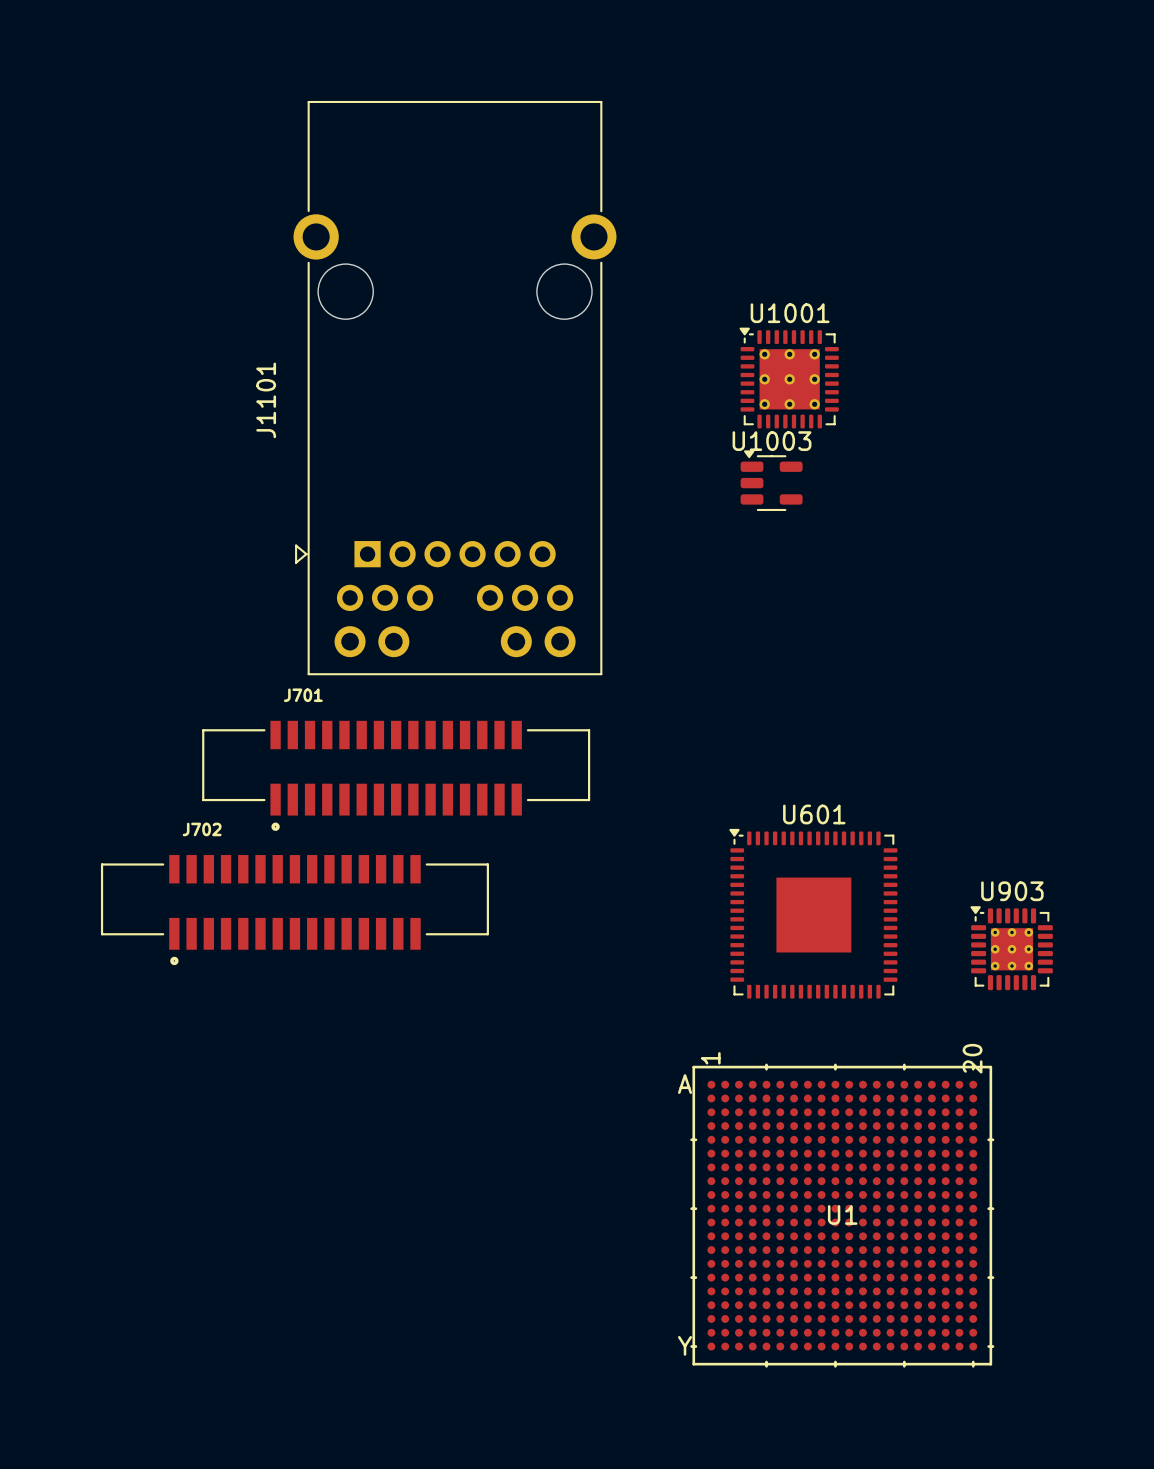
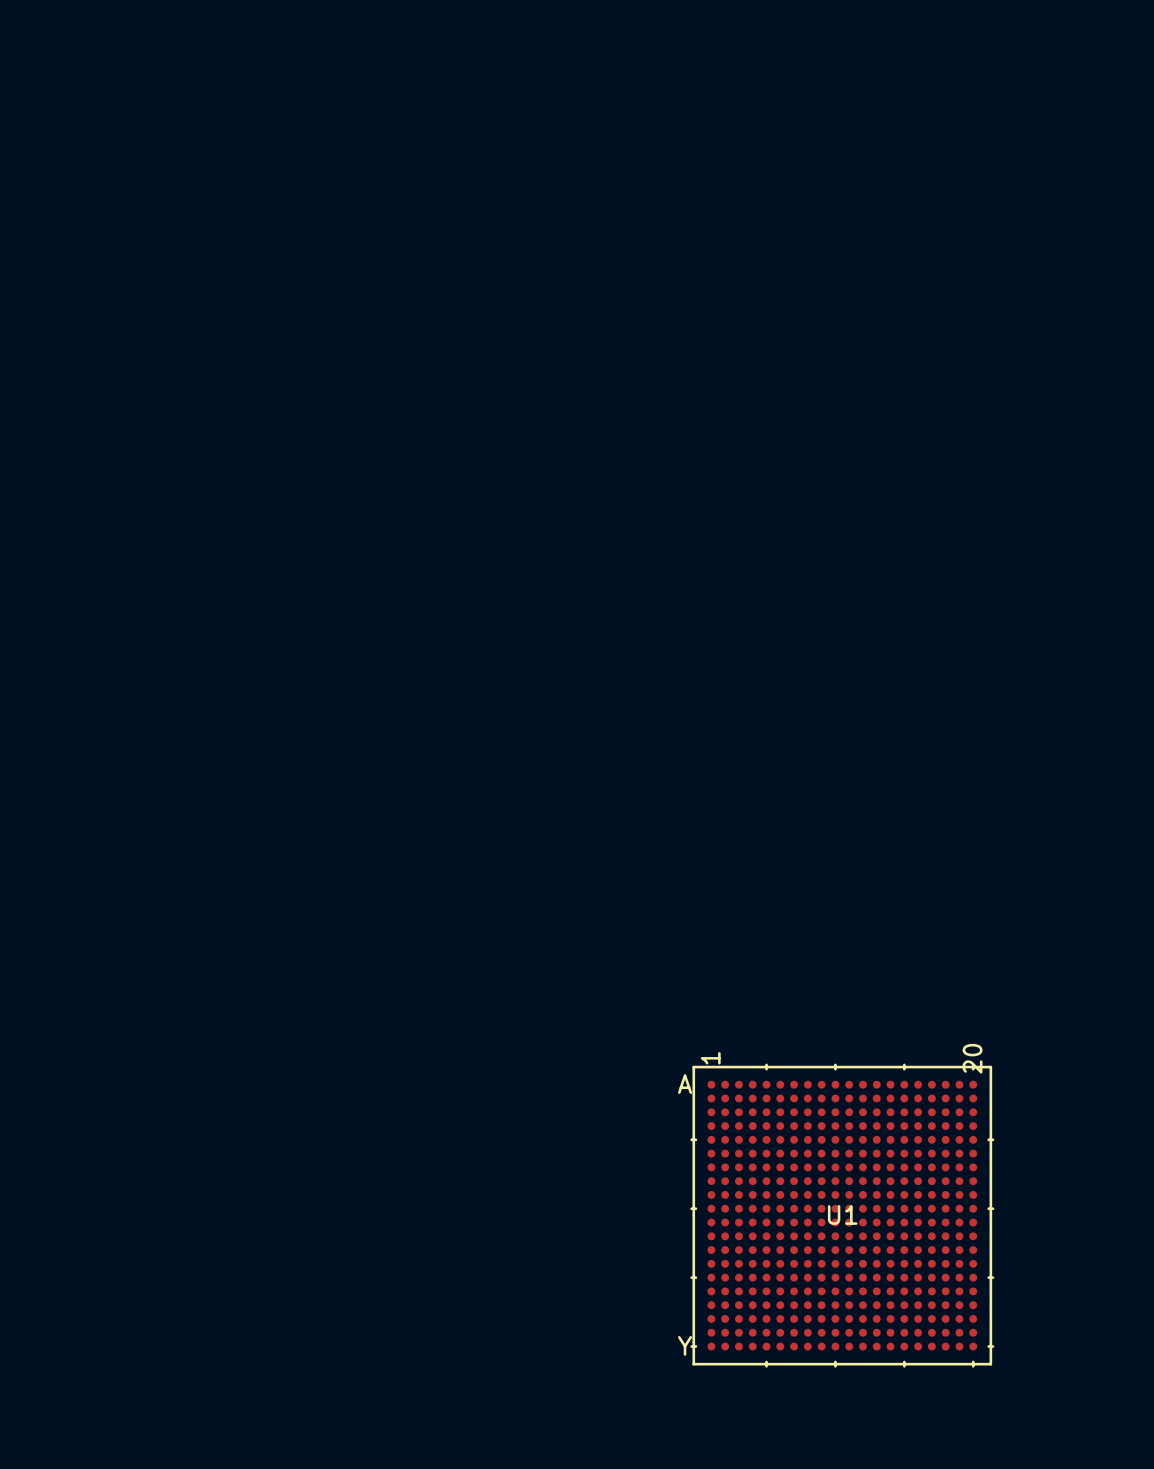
U1001: (789, 378) -> none
J1101: (454, 388) -> none
U1003: (771, 480) -> none
J701: (396, 775) -> none
J702: (294, 910) -> none
U601: (813, 913) -> none
U903: (1011, 948) -> none

